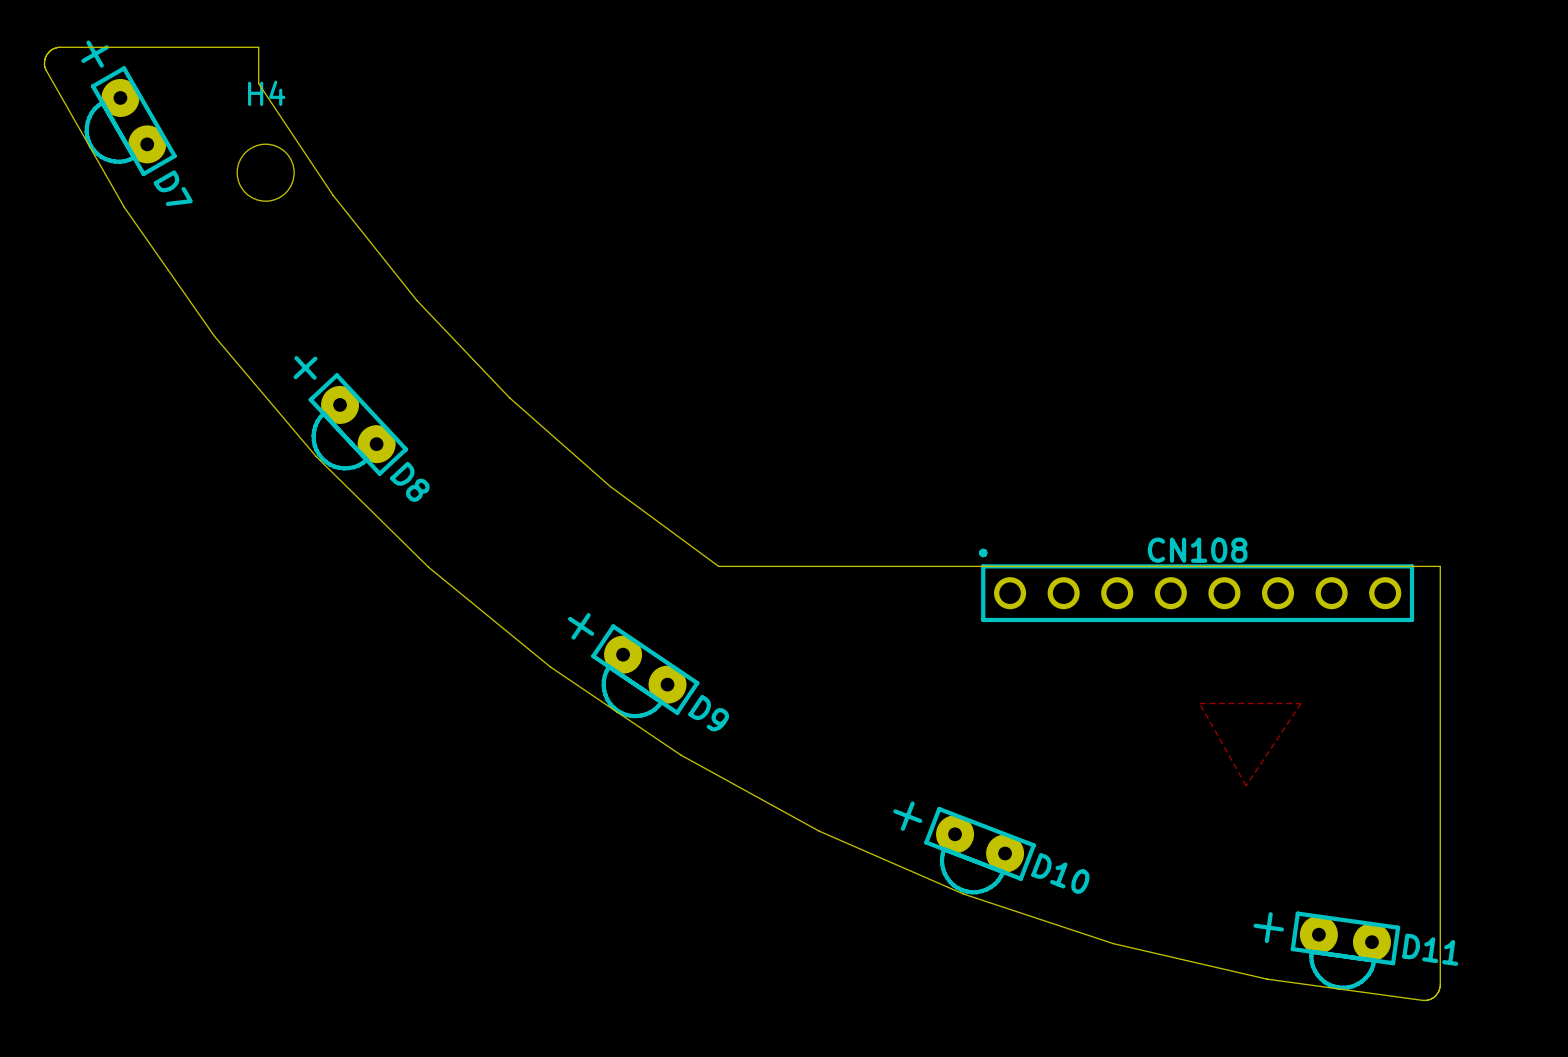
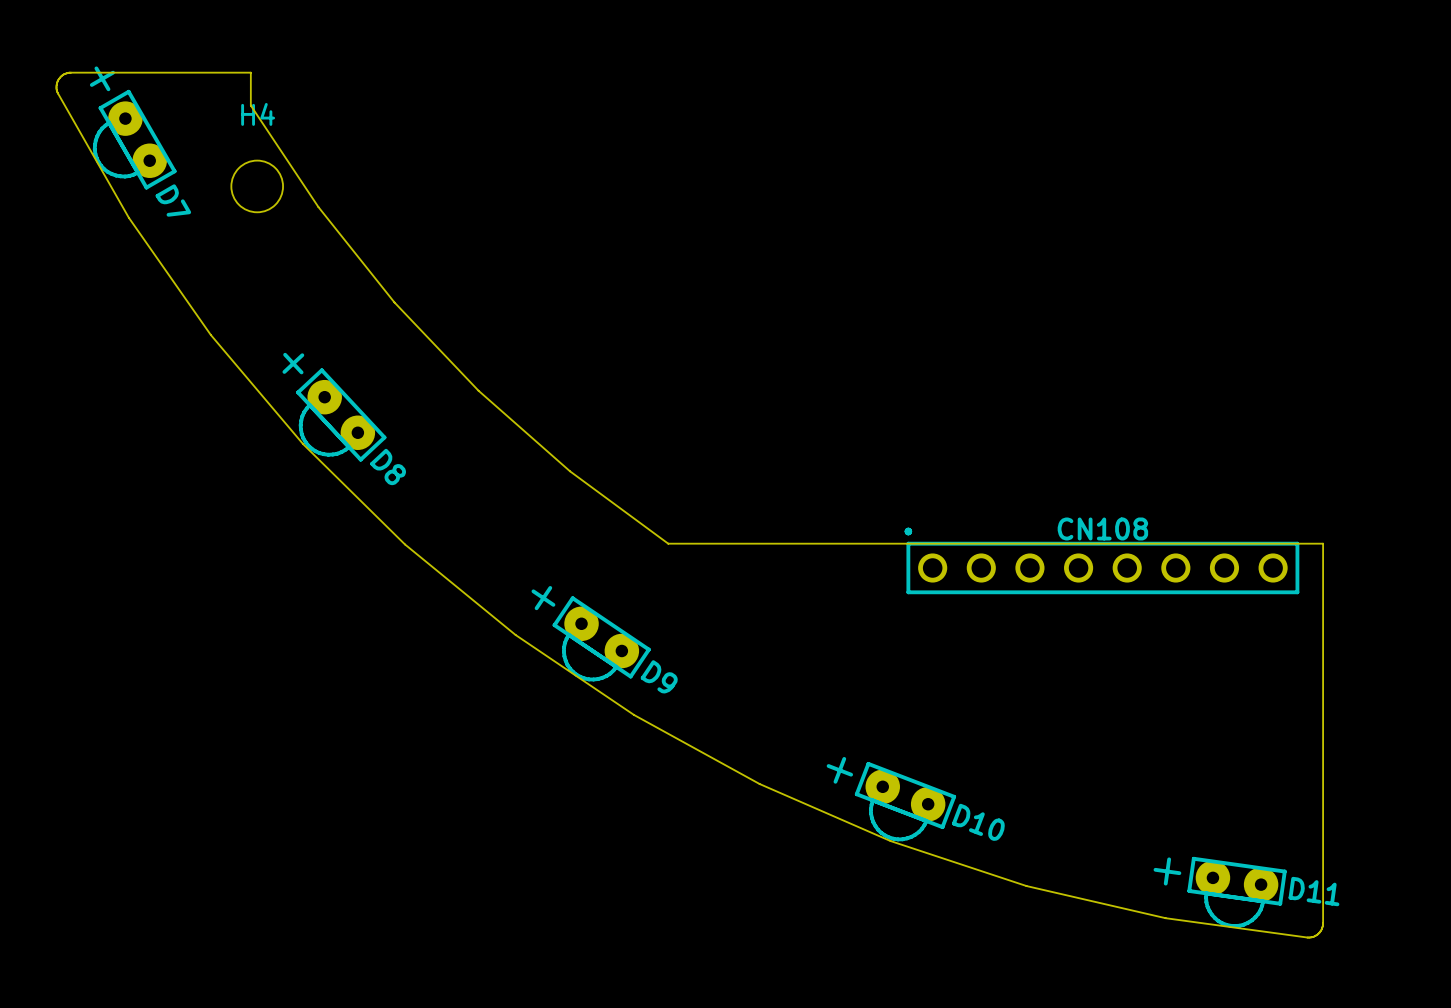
top zone outline: (1199, 703) (1246, 785) (1301, 703) (1199, 703) -> none

